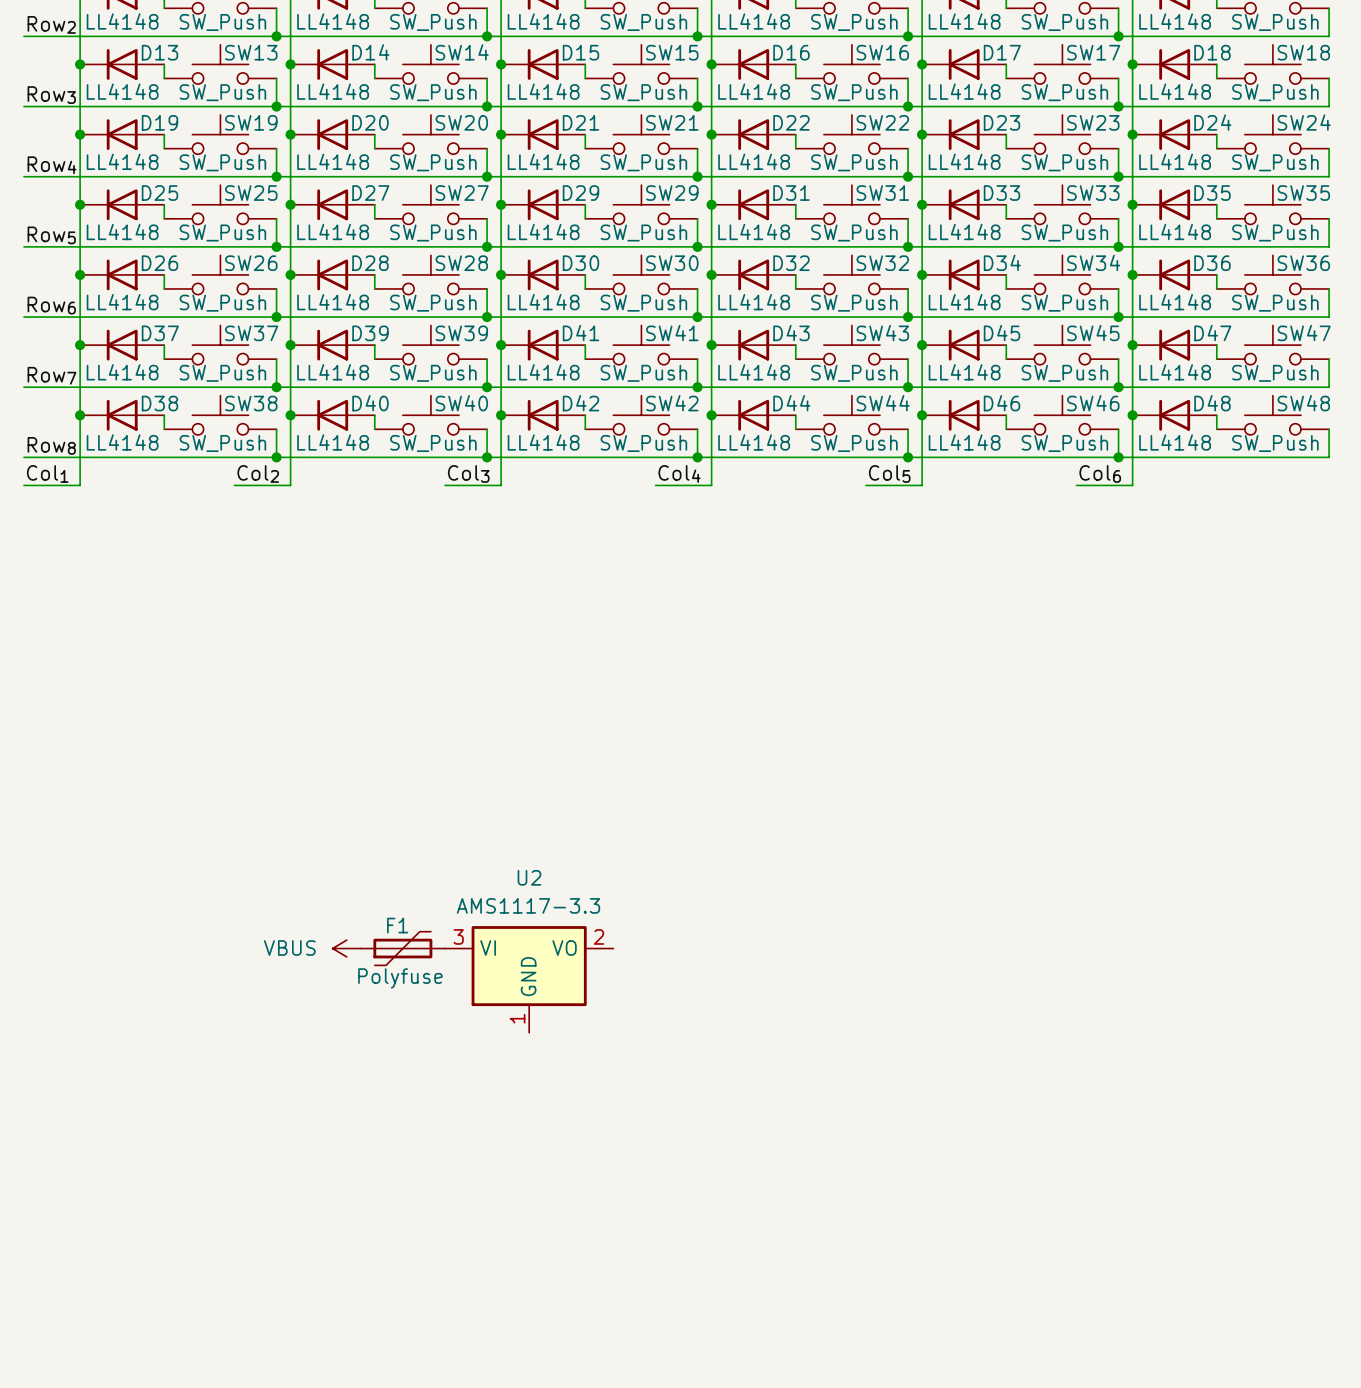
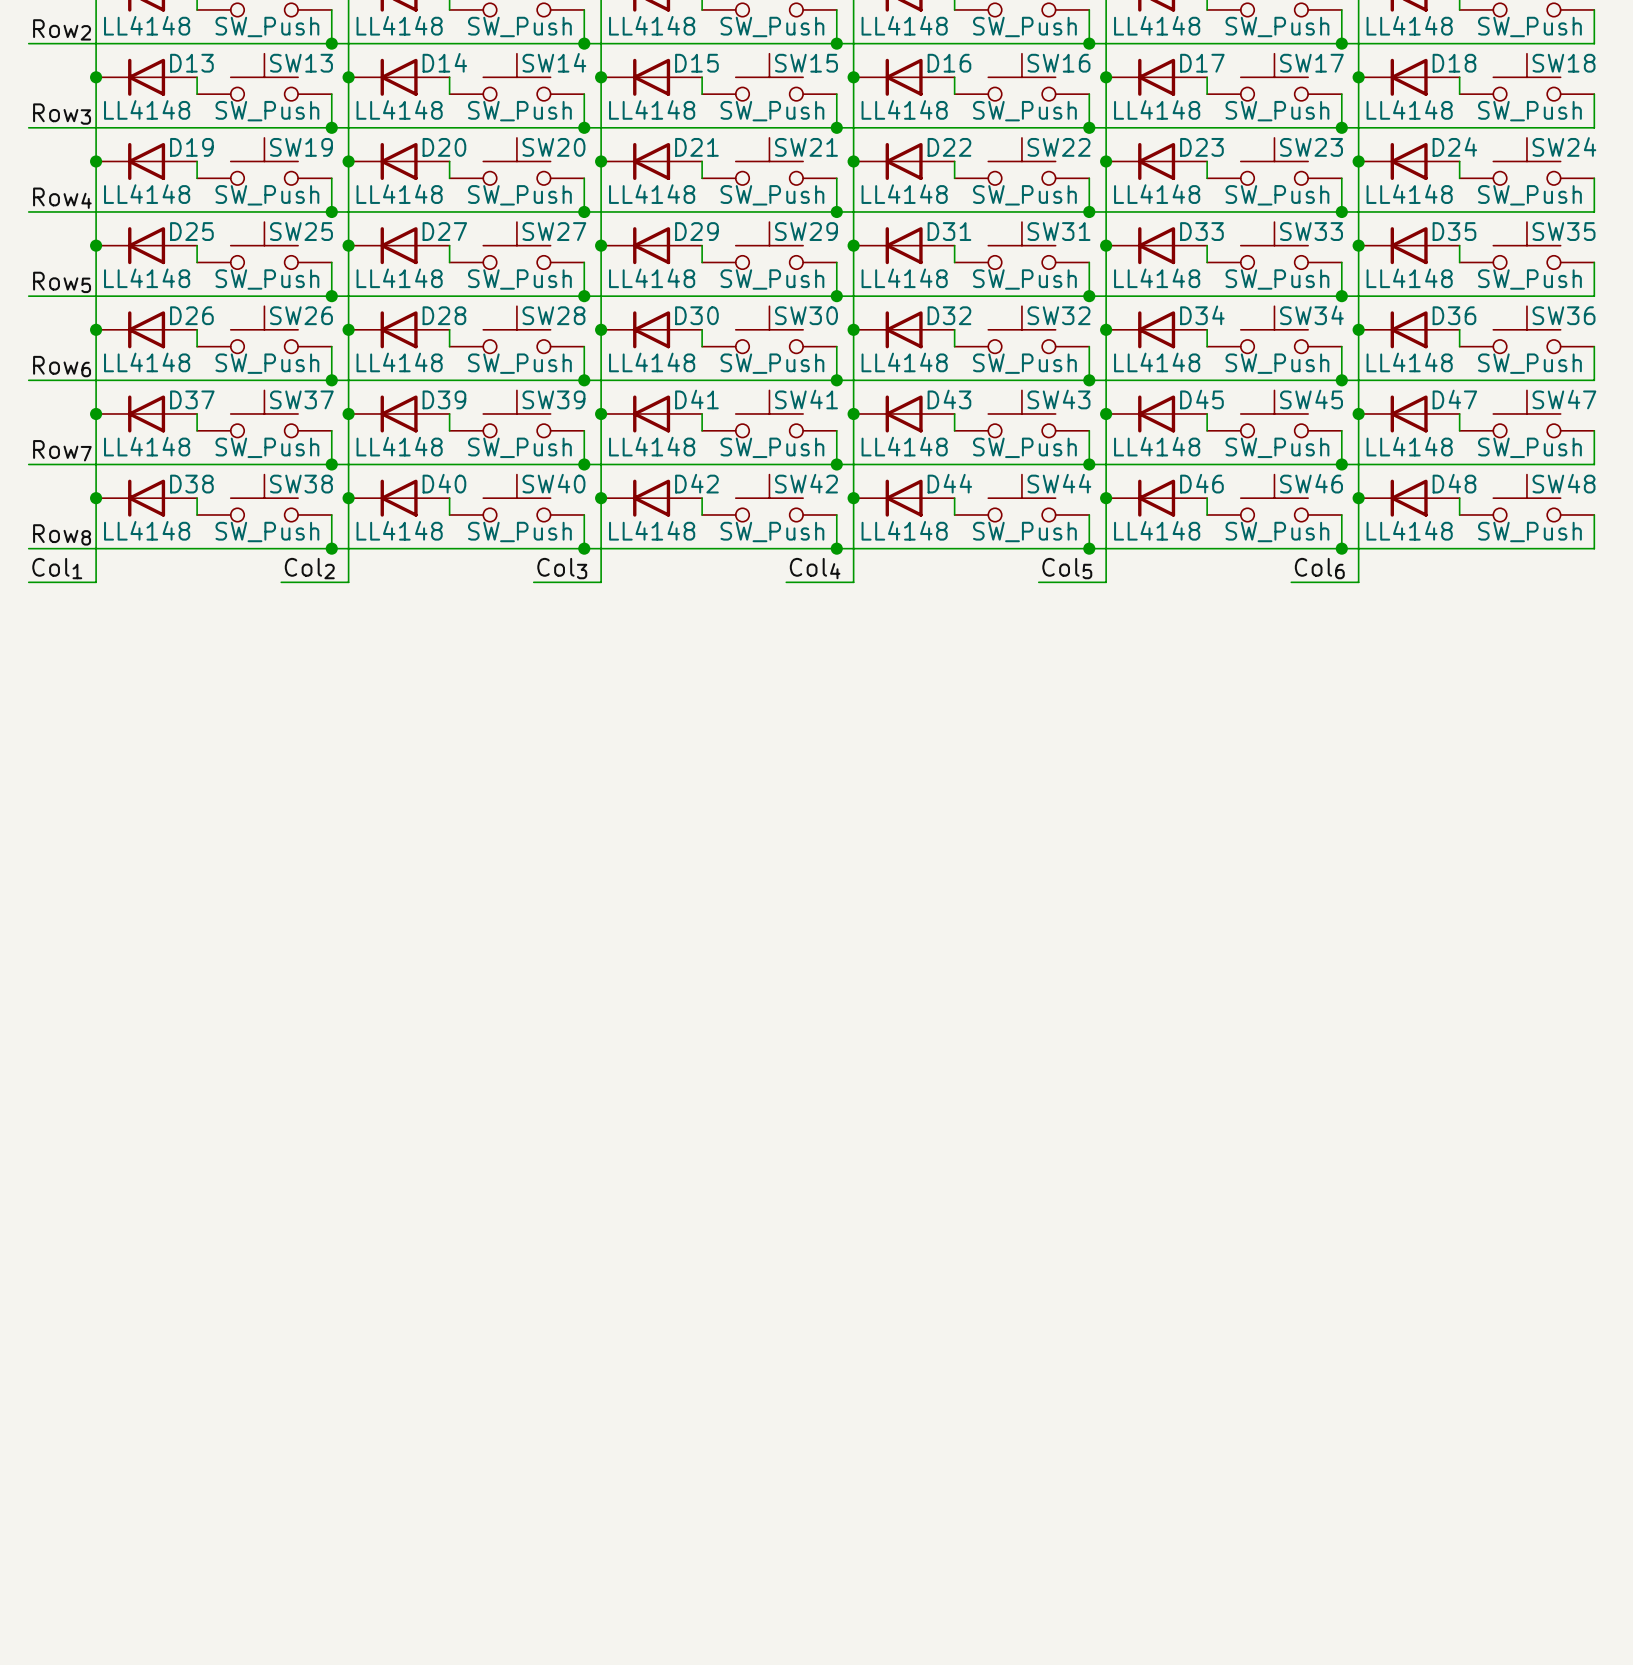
power symbol: VBUS (346, 948) -> none
F1: Polyfuse (402, 948) -> none
U2: AMS1117-3.3 (529, 979) -> none

